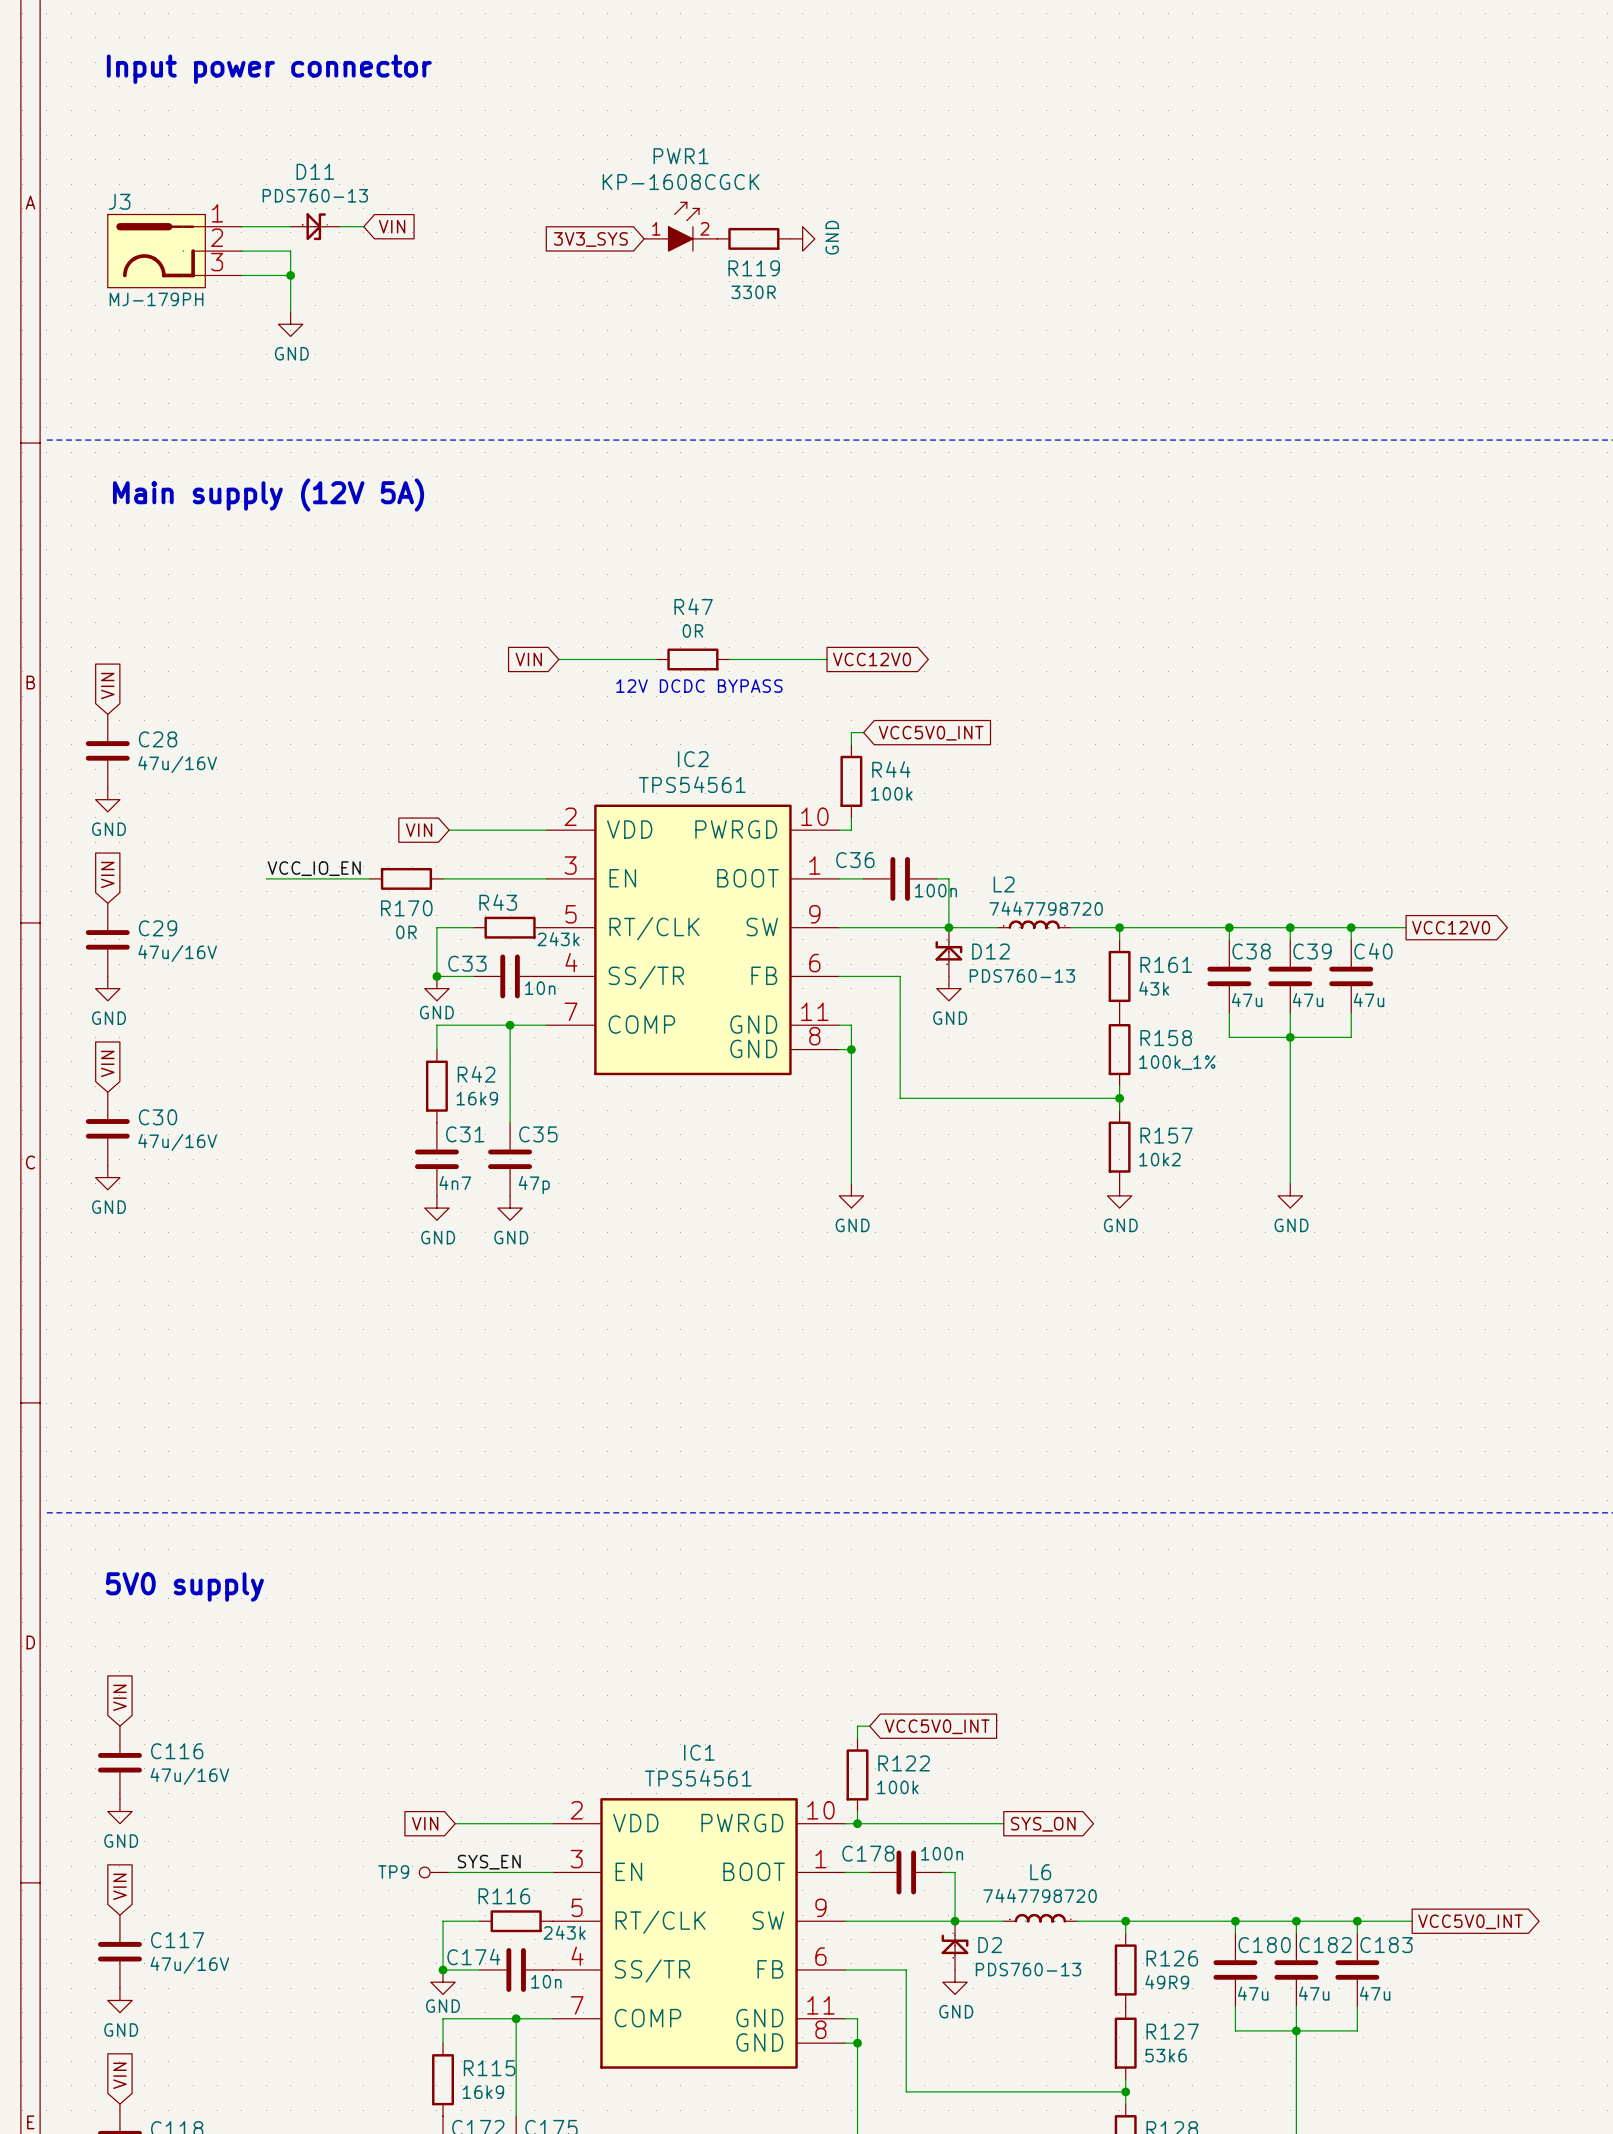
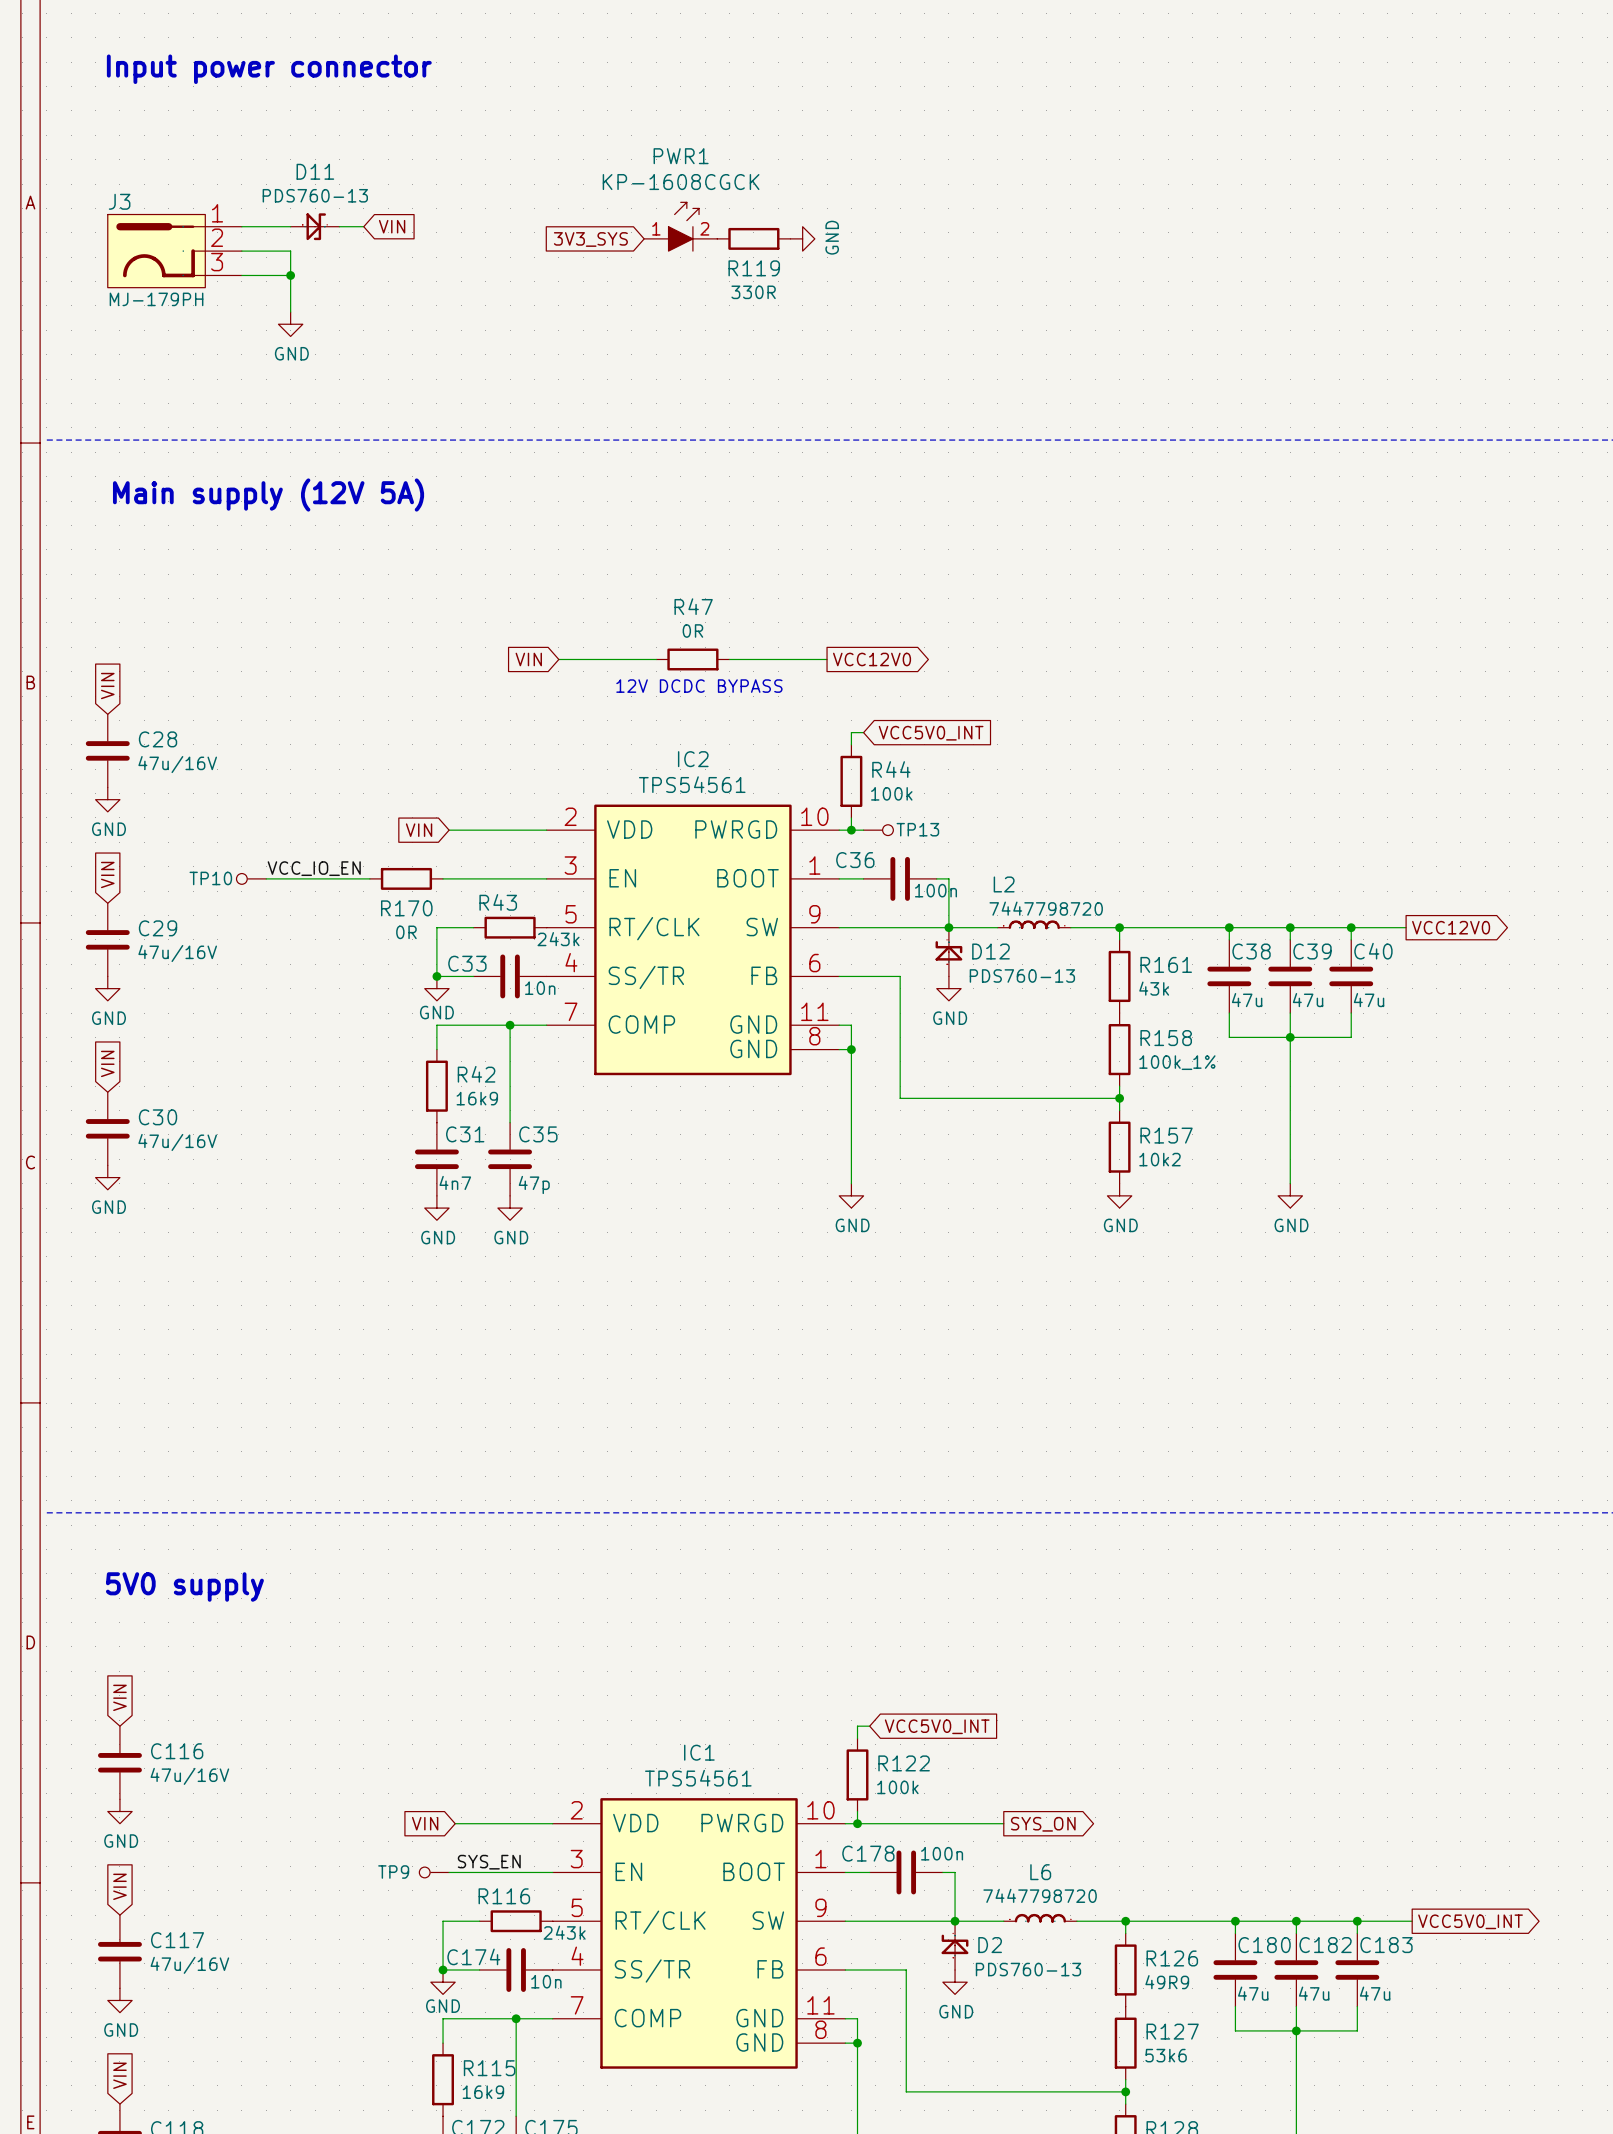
wire: none -> (851, 830) (863, 830)
junction: none -> (851, 830)
TP13: none -> (878, 830)
TP10: none -> (251, 878)

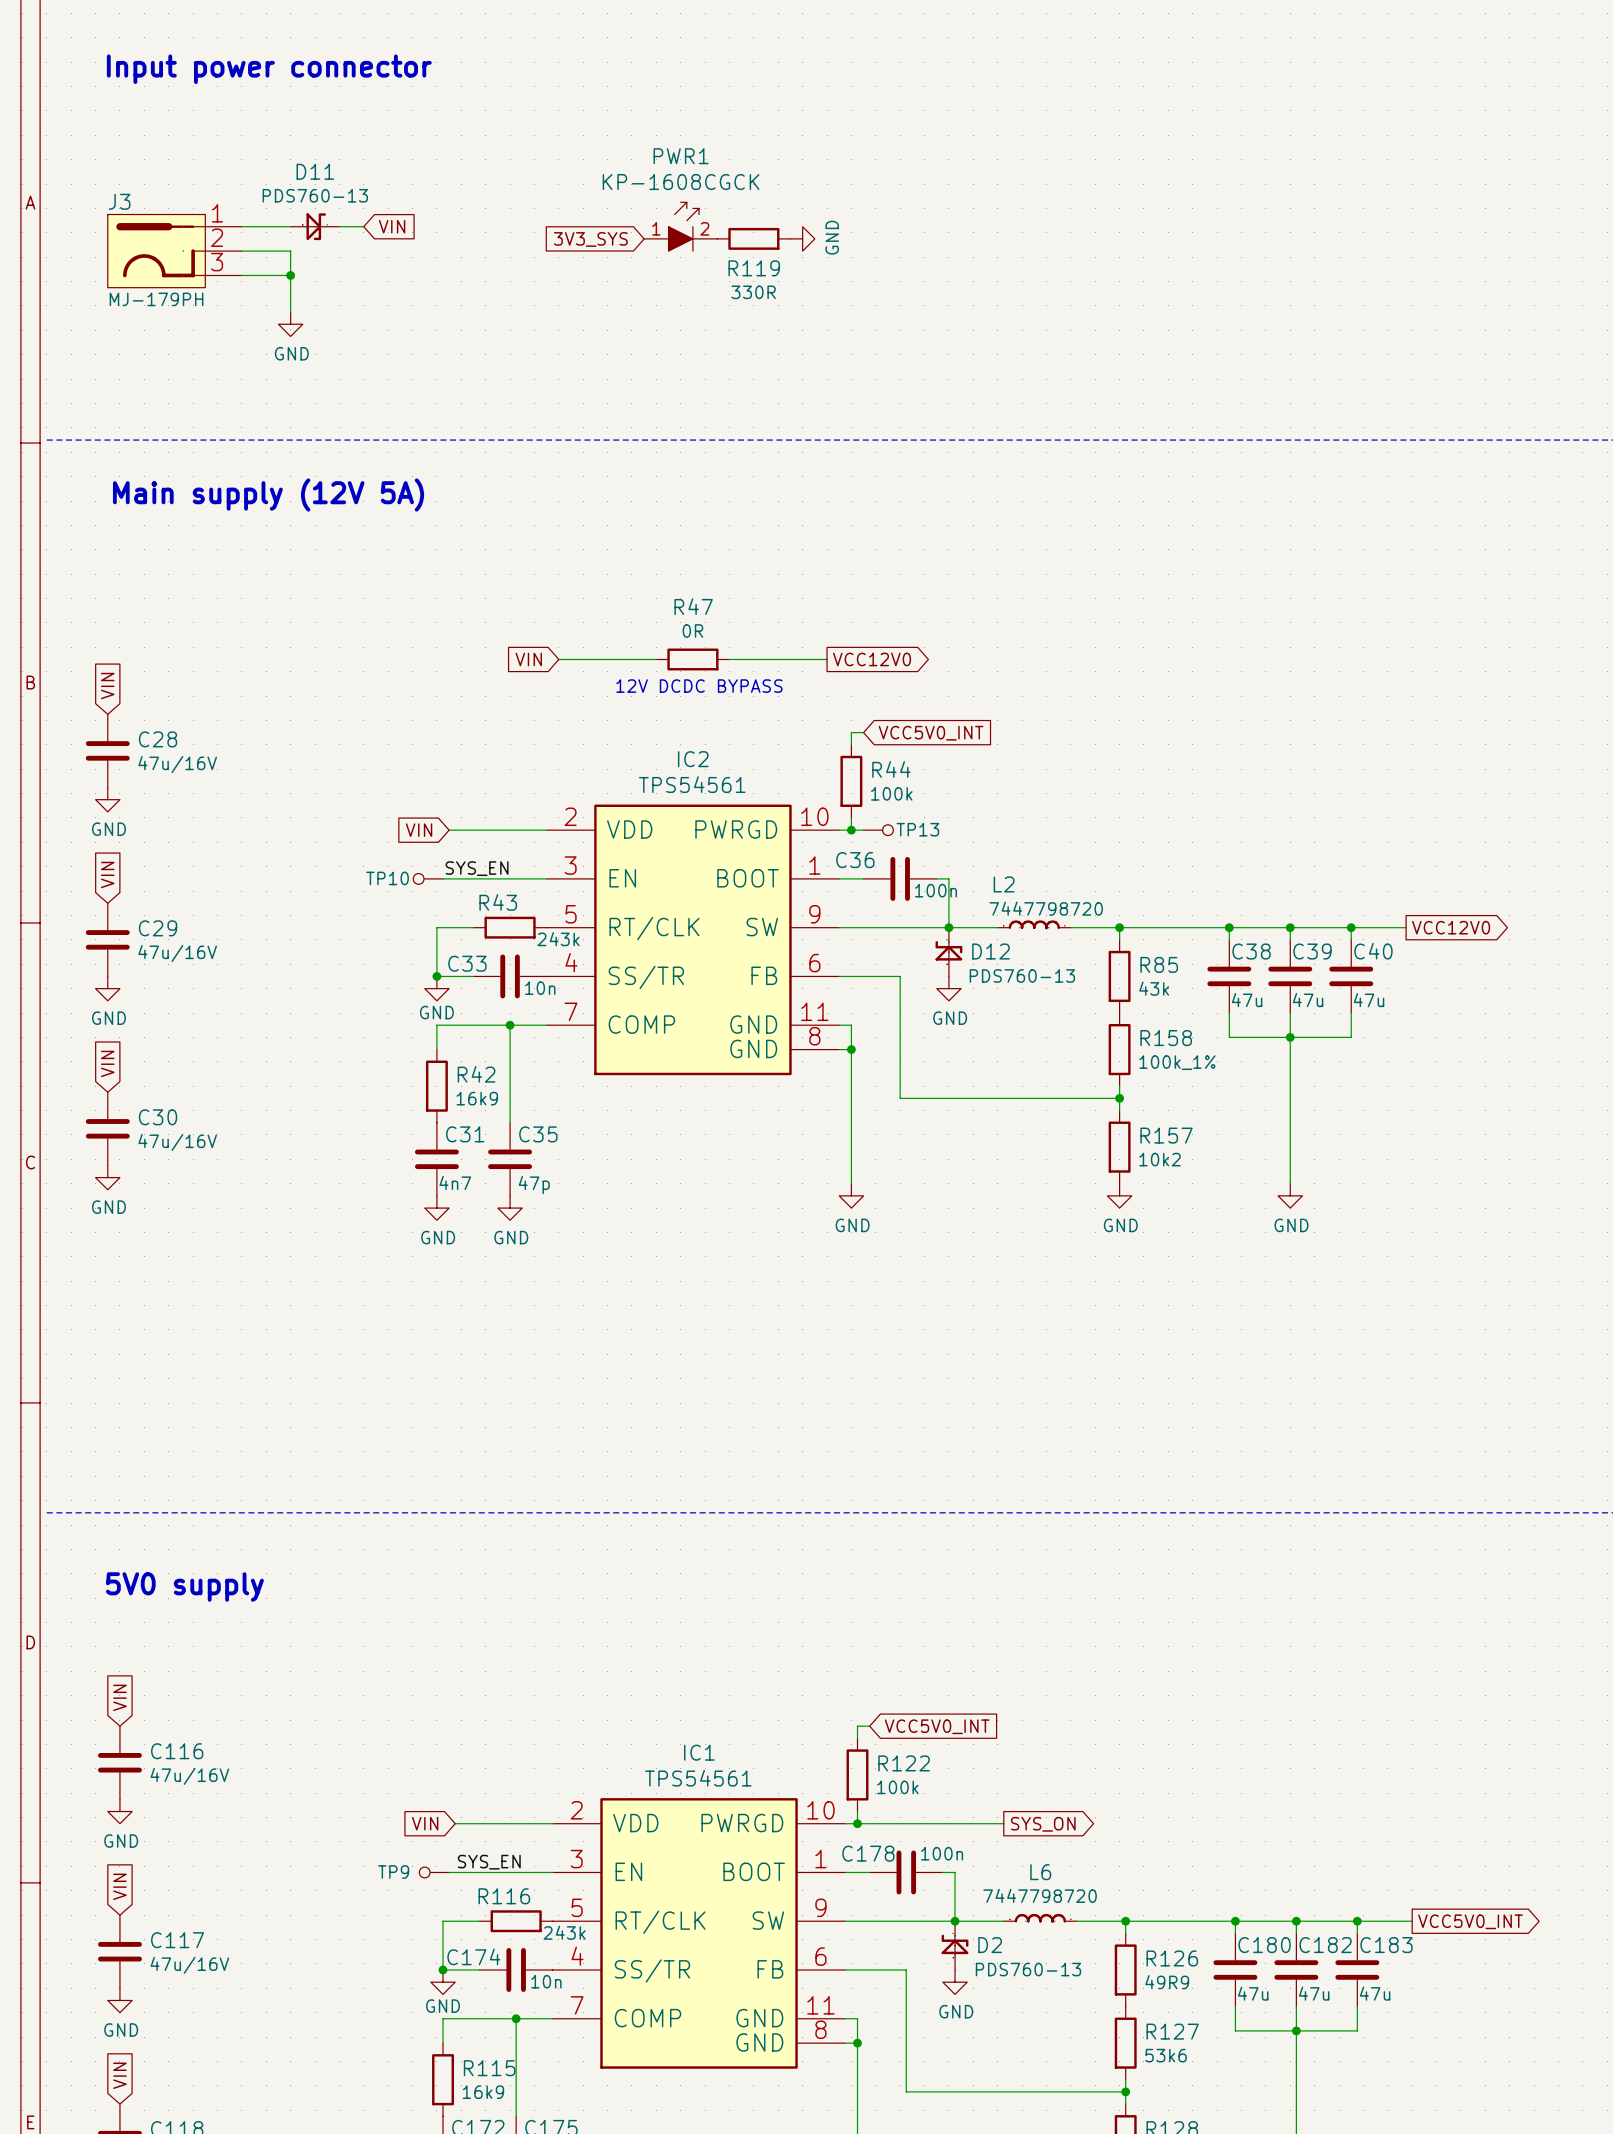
label: VCC_IO_EN (314, 868) -> none
label: none -> SYS_EN (477, 868)
TP10 position: (251, 878) -> (428, 878)
wire: (266, 878) (369, 878) -> none
R170: (406, 878) -> none
R161 name: R161 (1166, 964) -> R85 (1159, 964)

